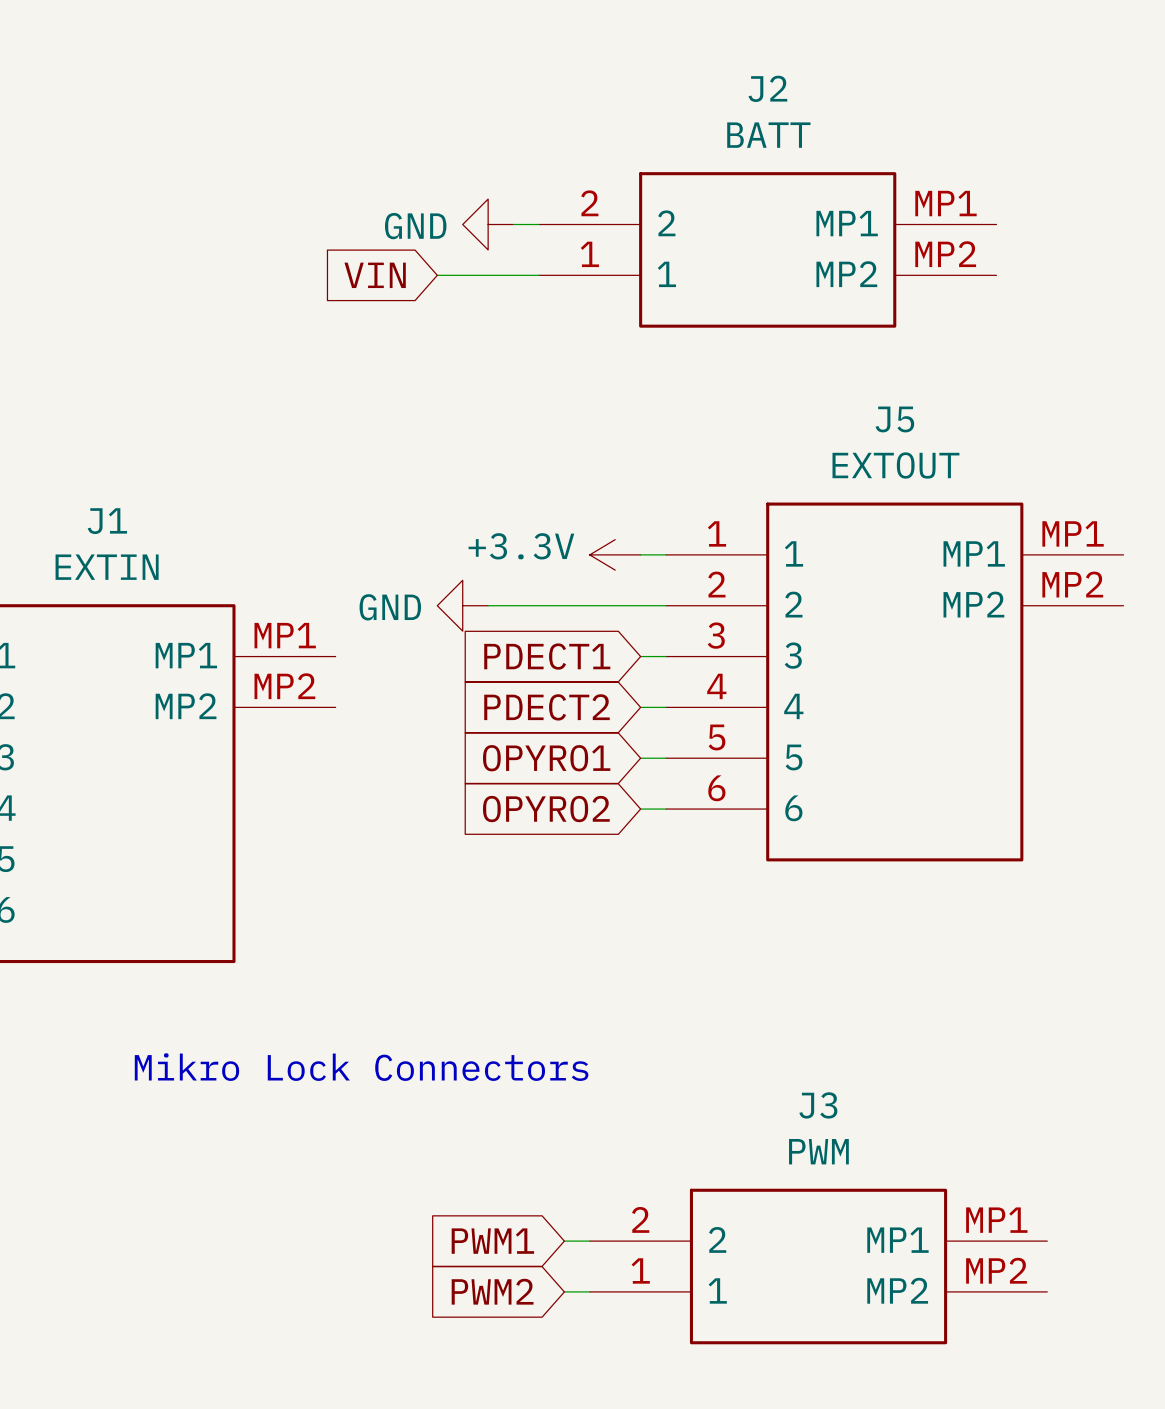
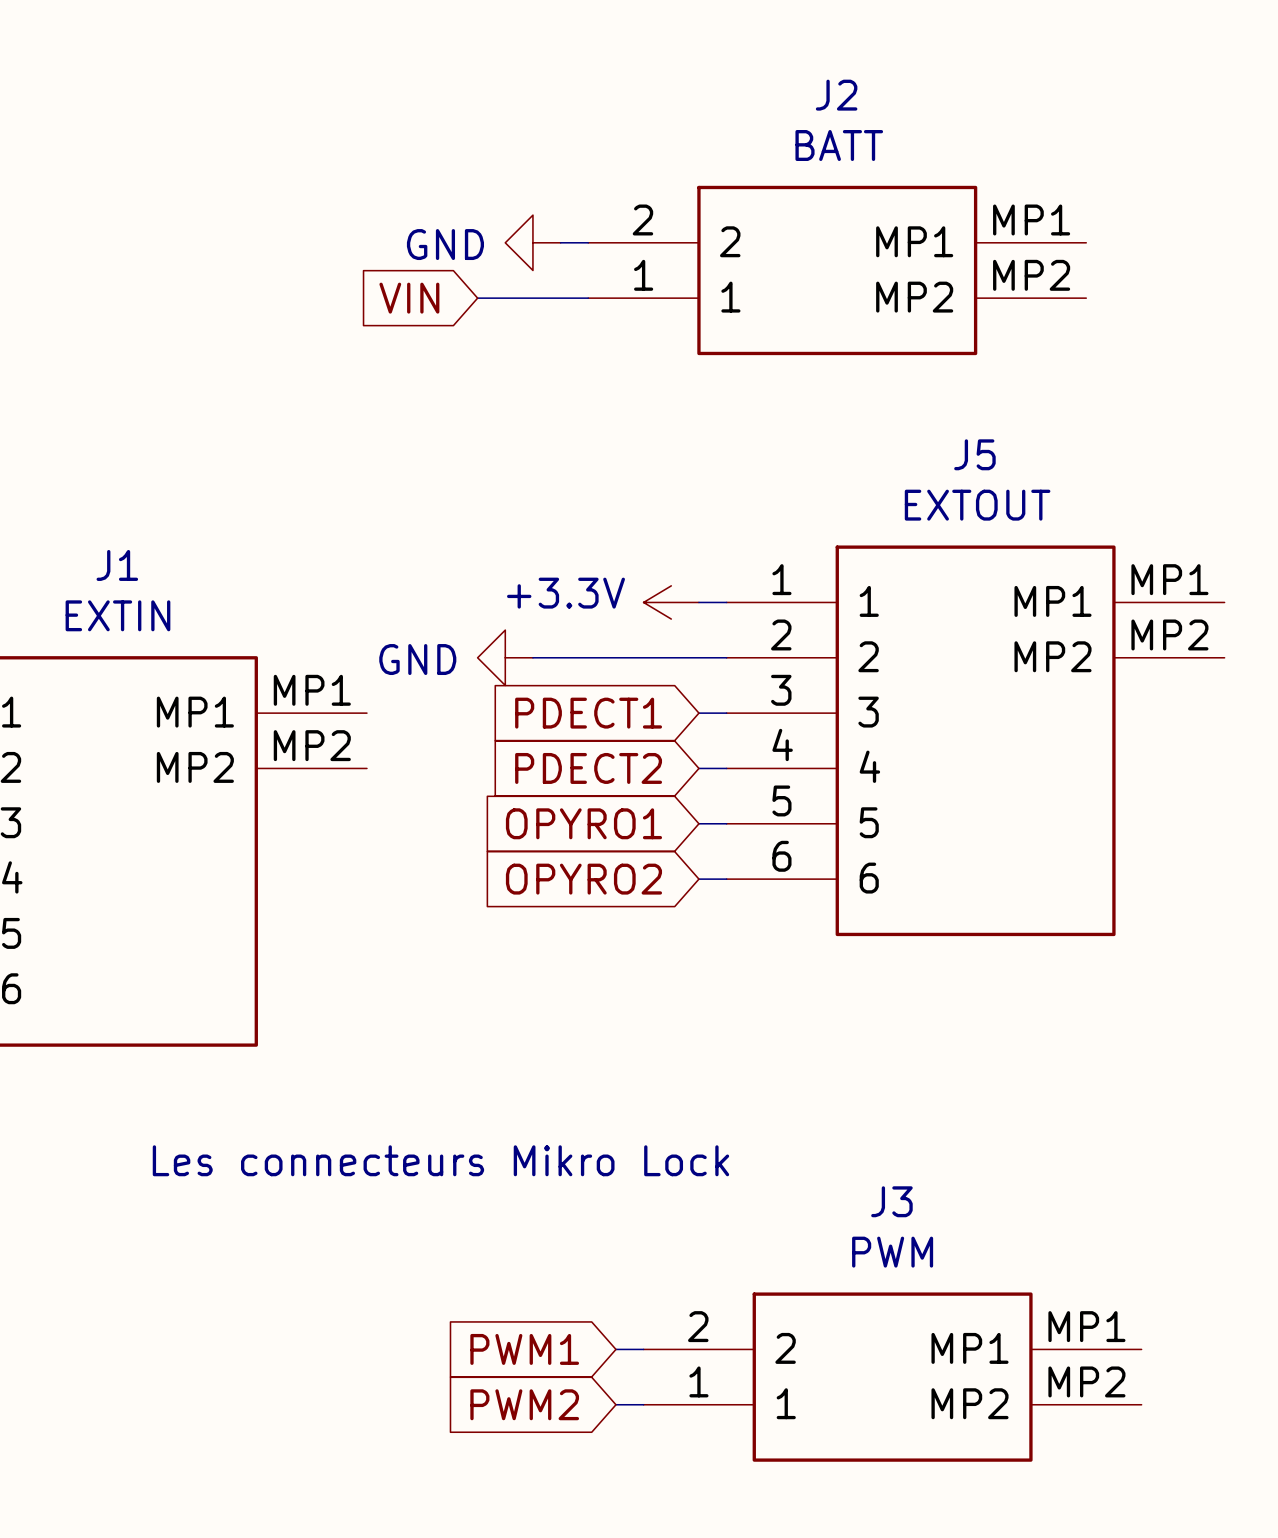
text: Mikro Lock Connectors (361, 1067) -> Les connecteurs Mikro Lock (440, 1160)

